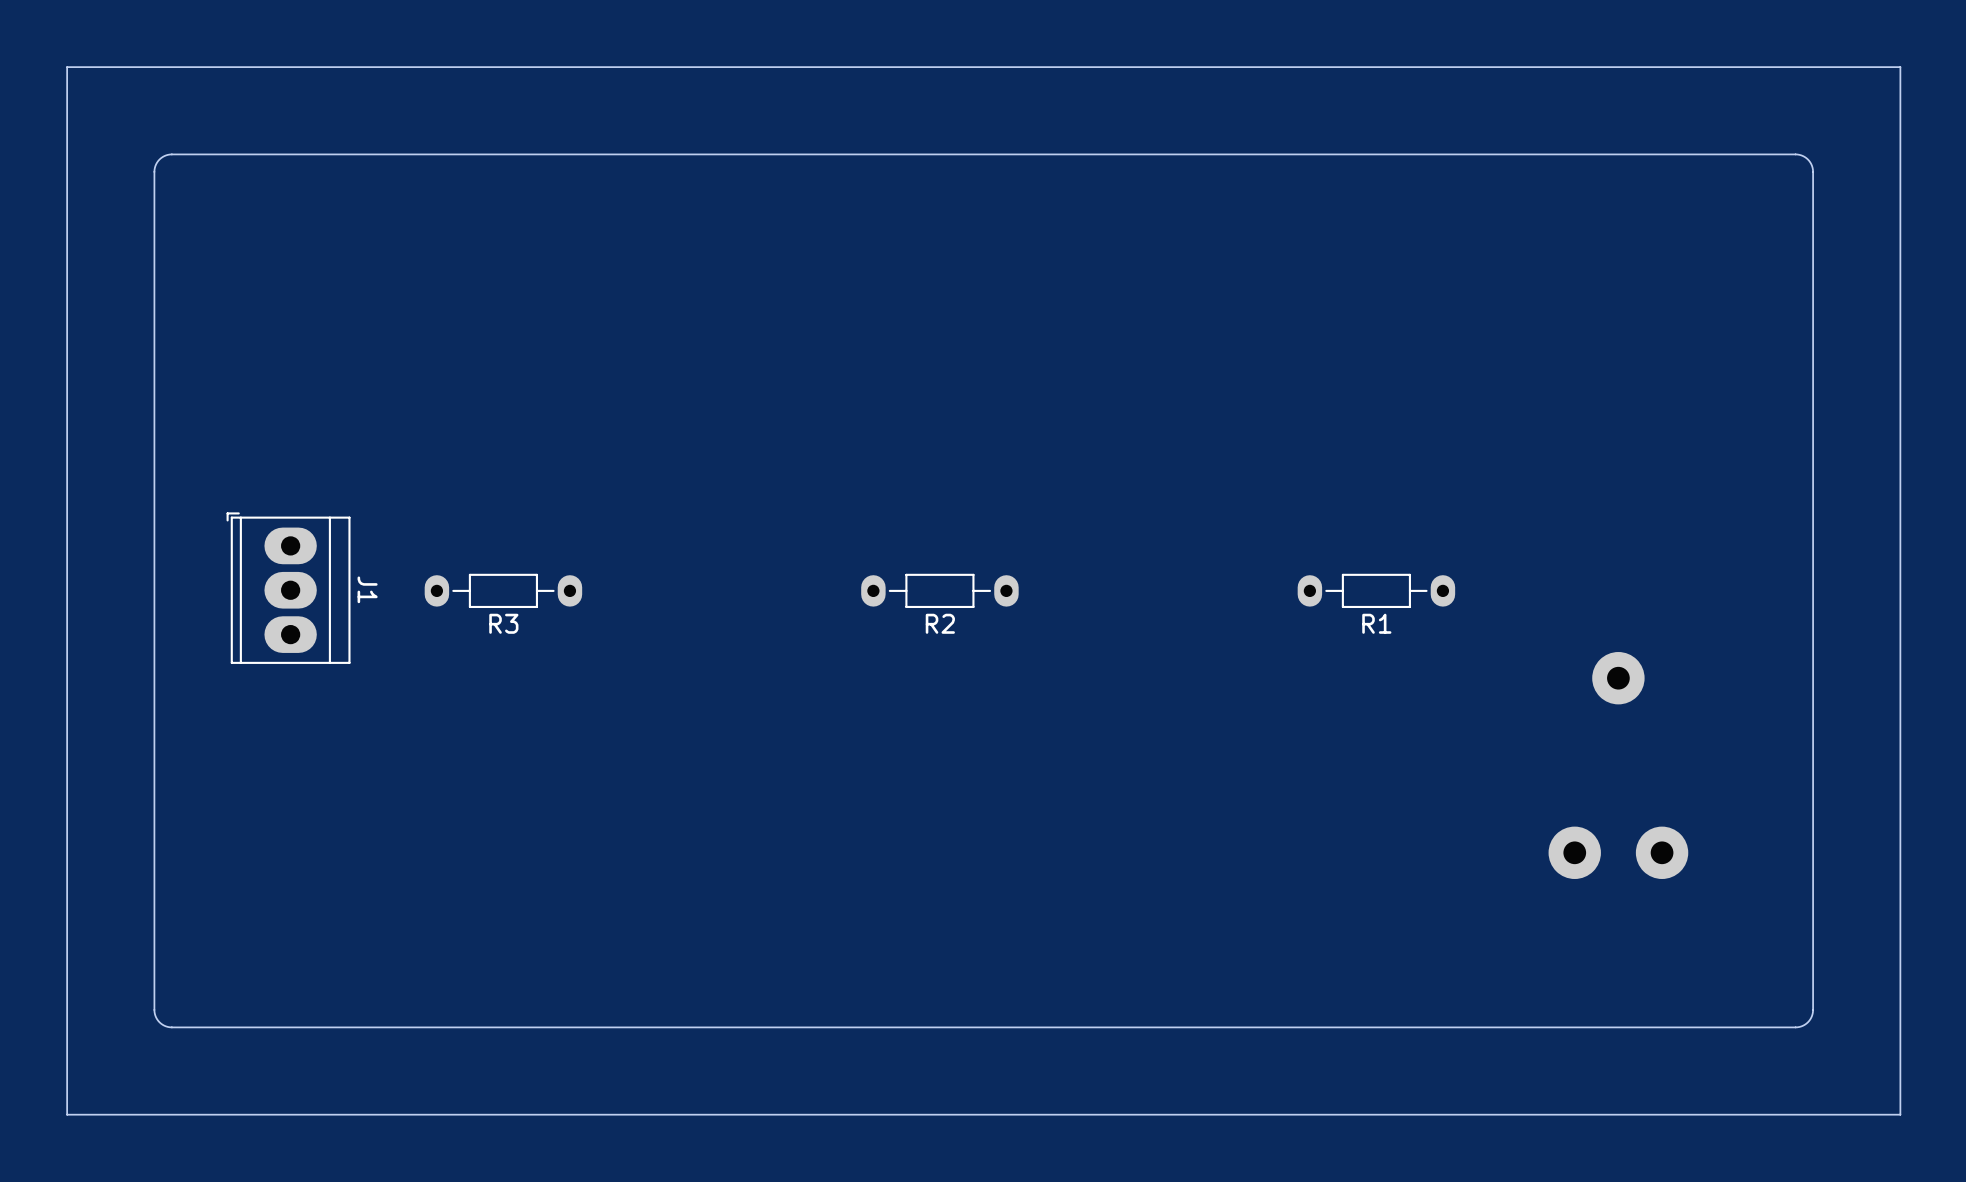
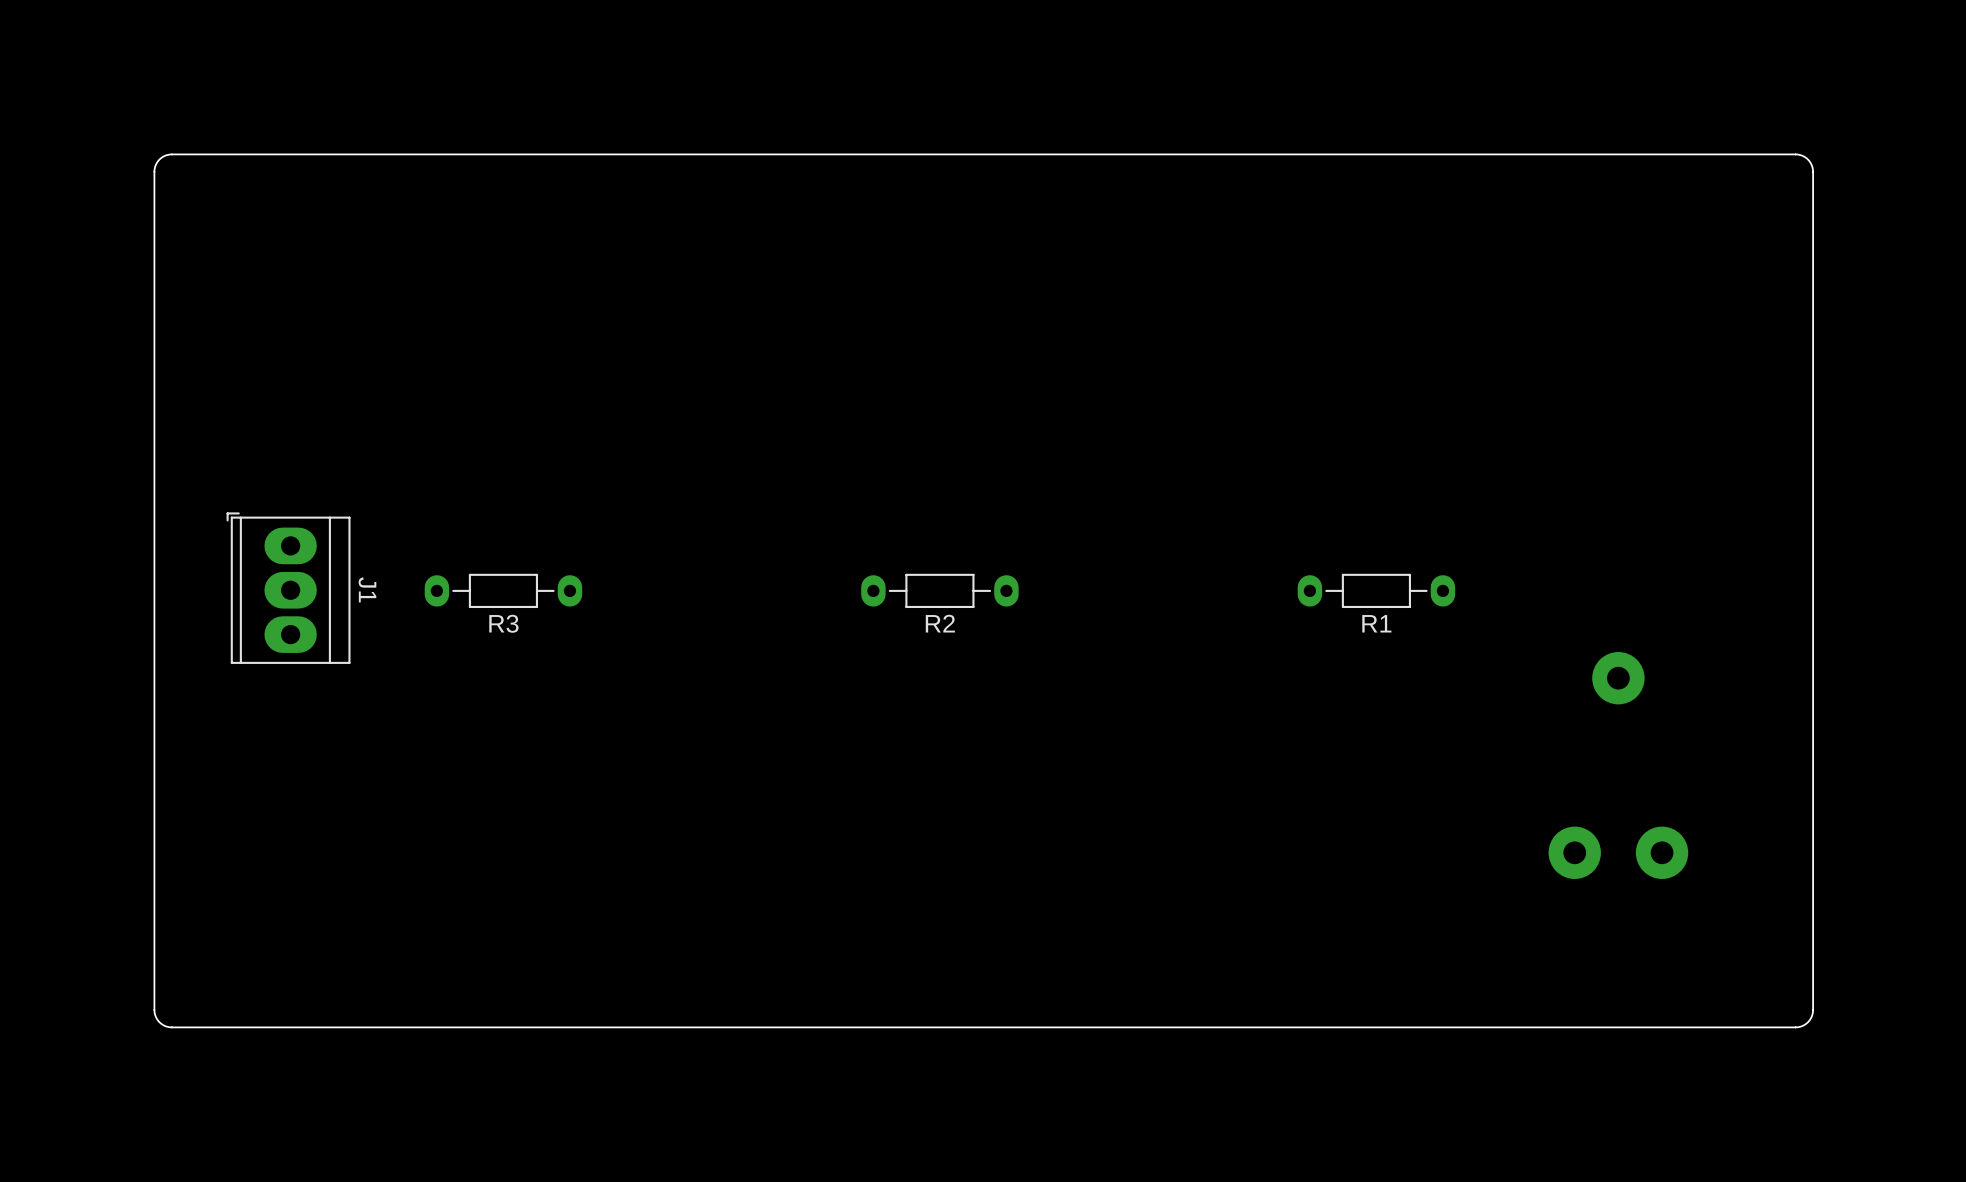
board edge: (1900, 67) (67, 67) (67, 1114) (1900, 1114) (1900, 67) -> none

